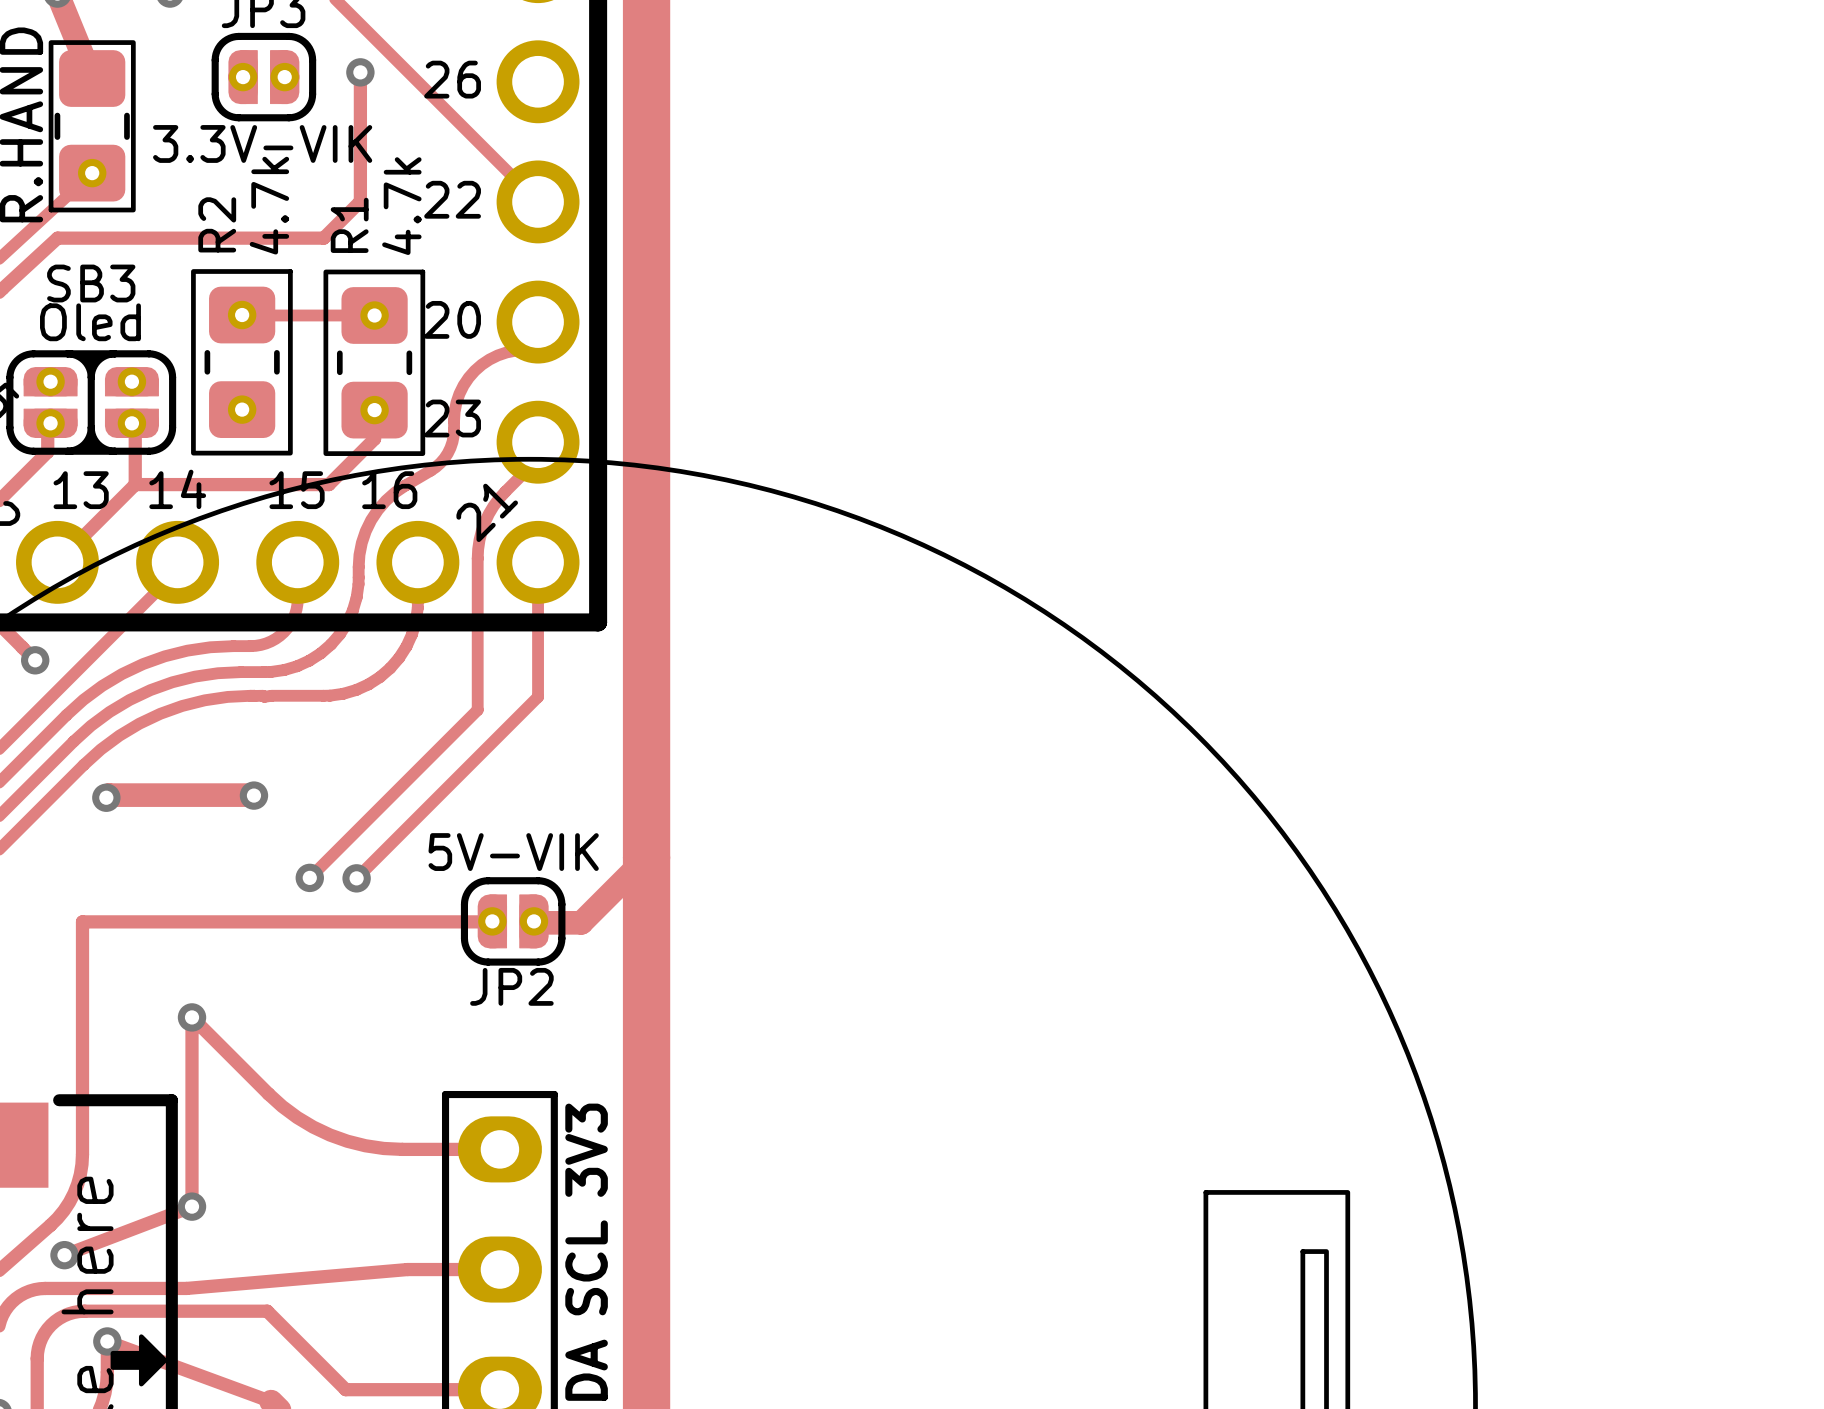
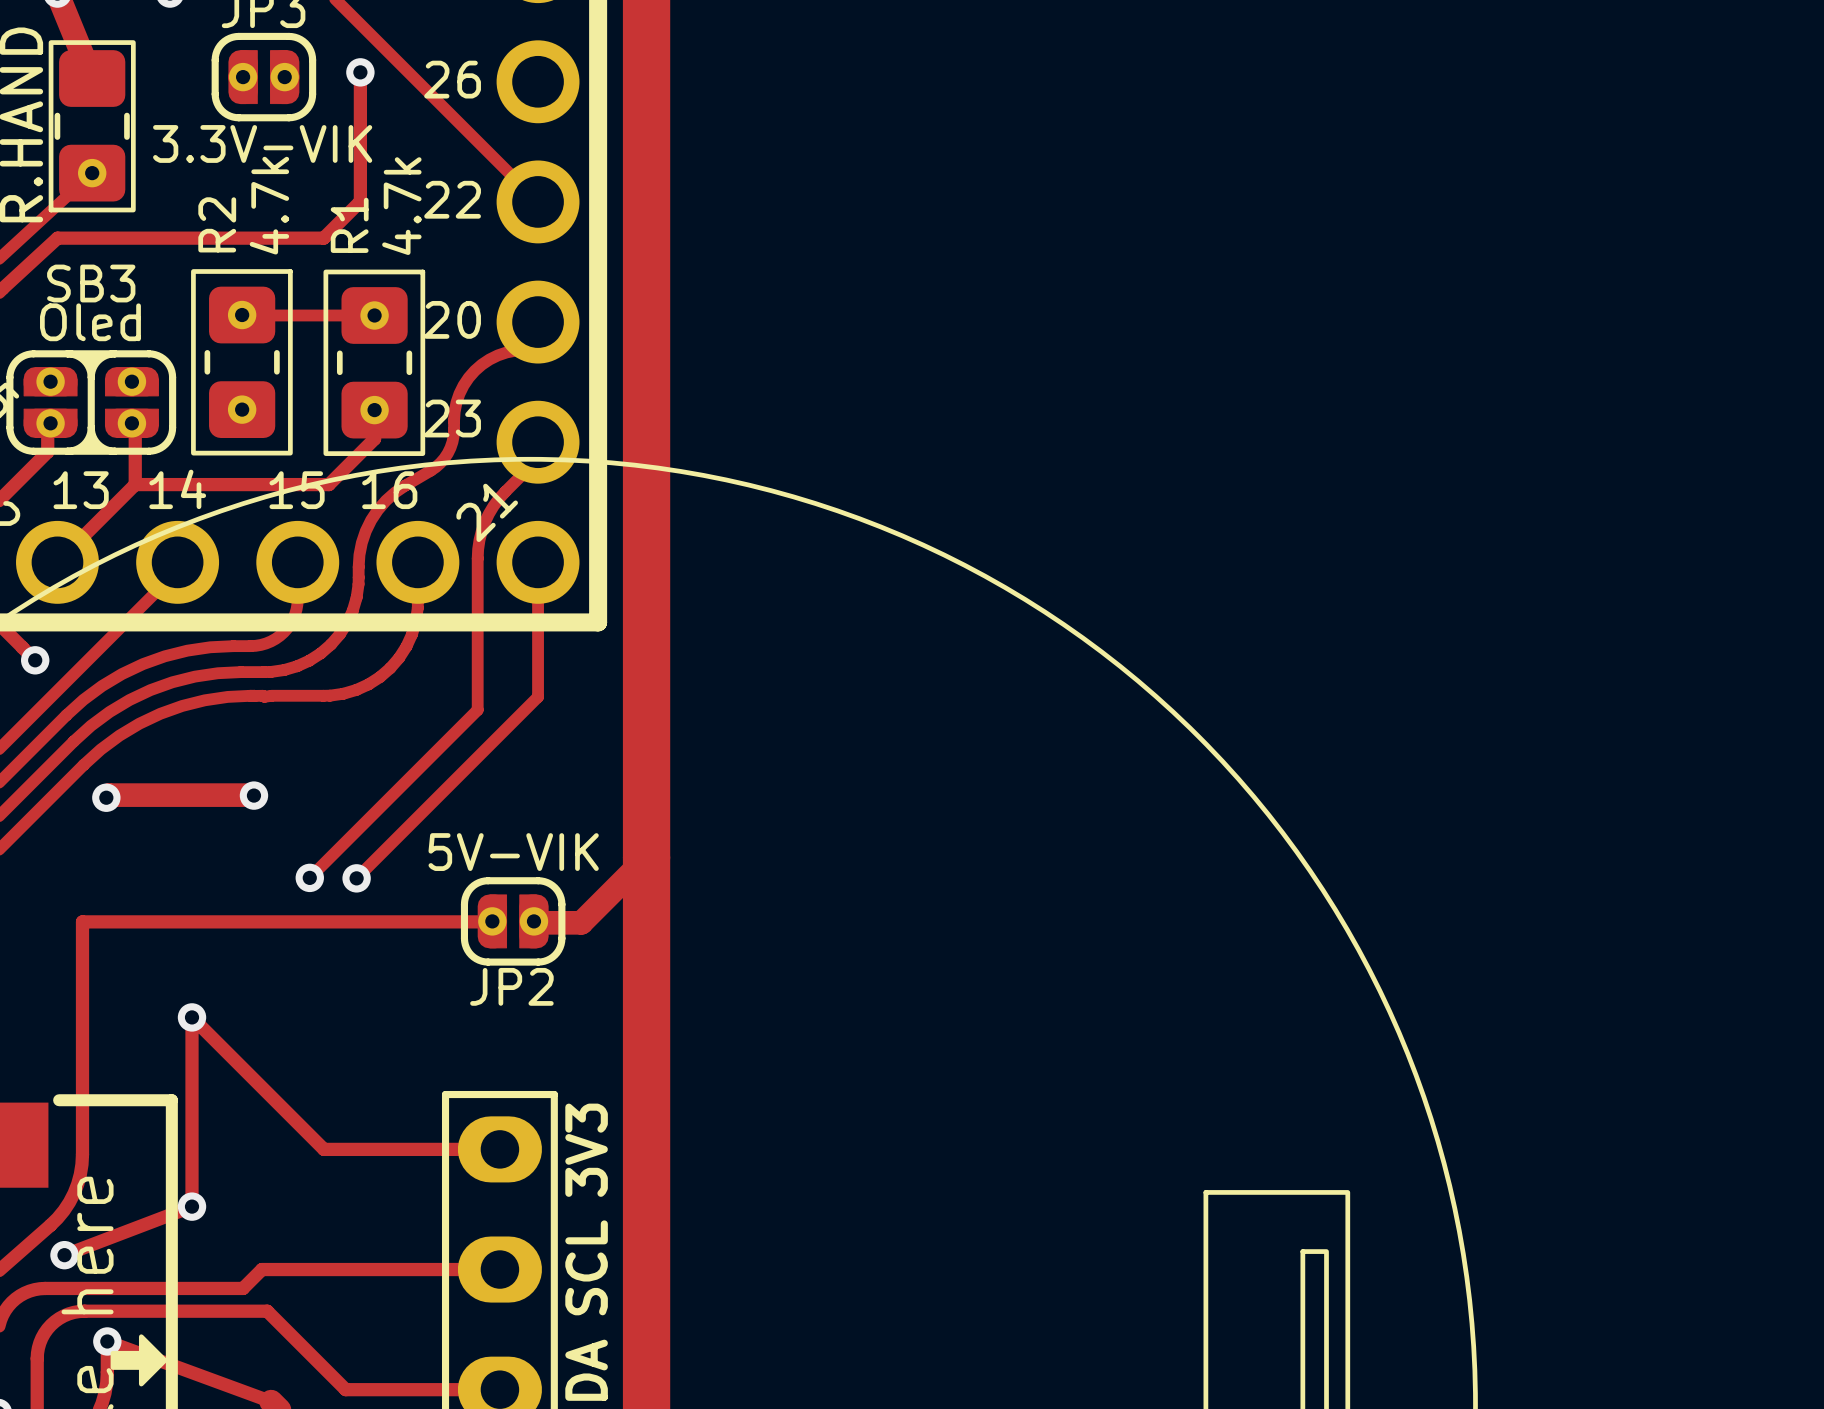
track: (268, 1093) (297, 1117) (329, 1134) (365, 1145) (402, 1149) -> (268, 1093) (323, 1149) (402, 1149)
track: (407, 1269) (186, 1288) -> (407, 1269) (262, 1269) (243, 1288) (186, 1288)

